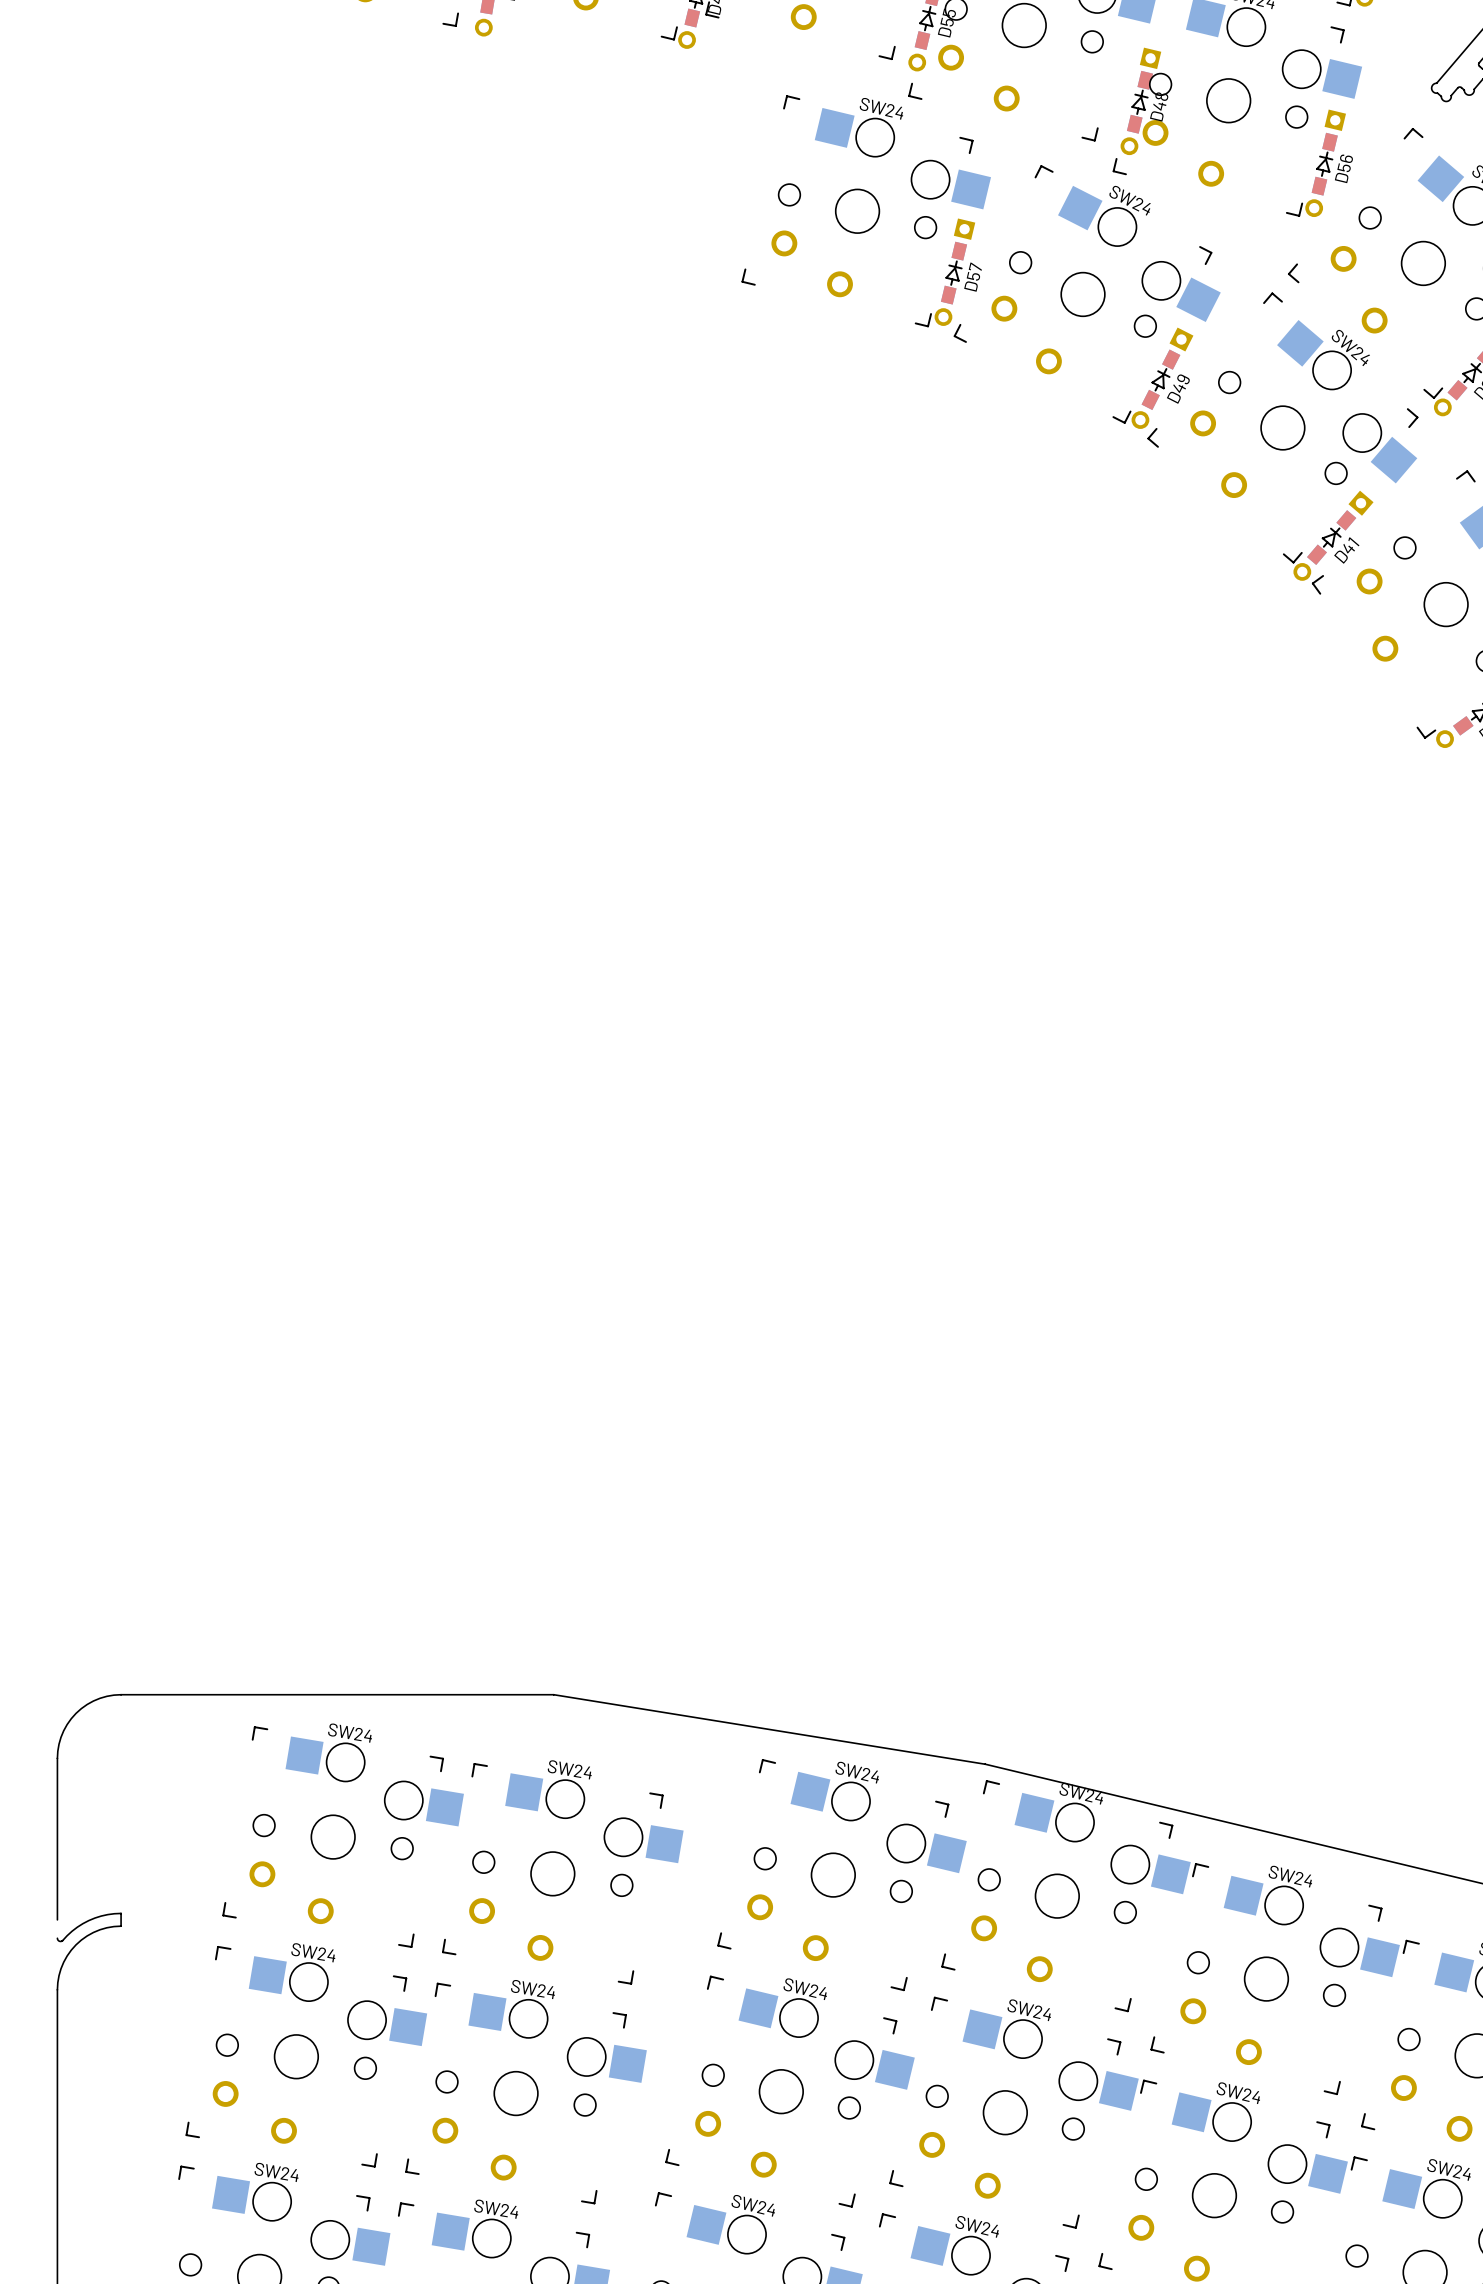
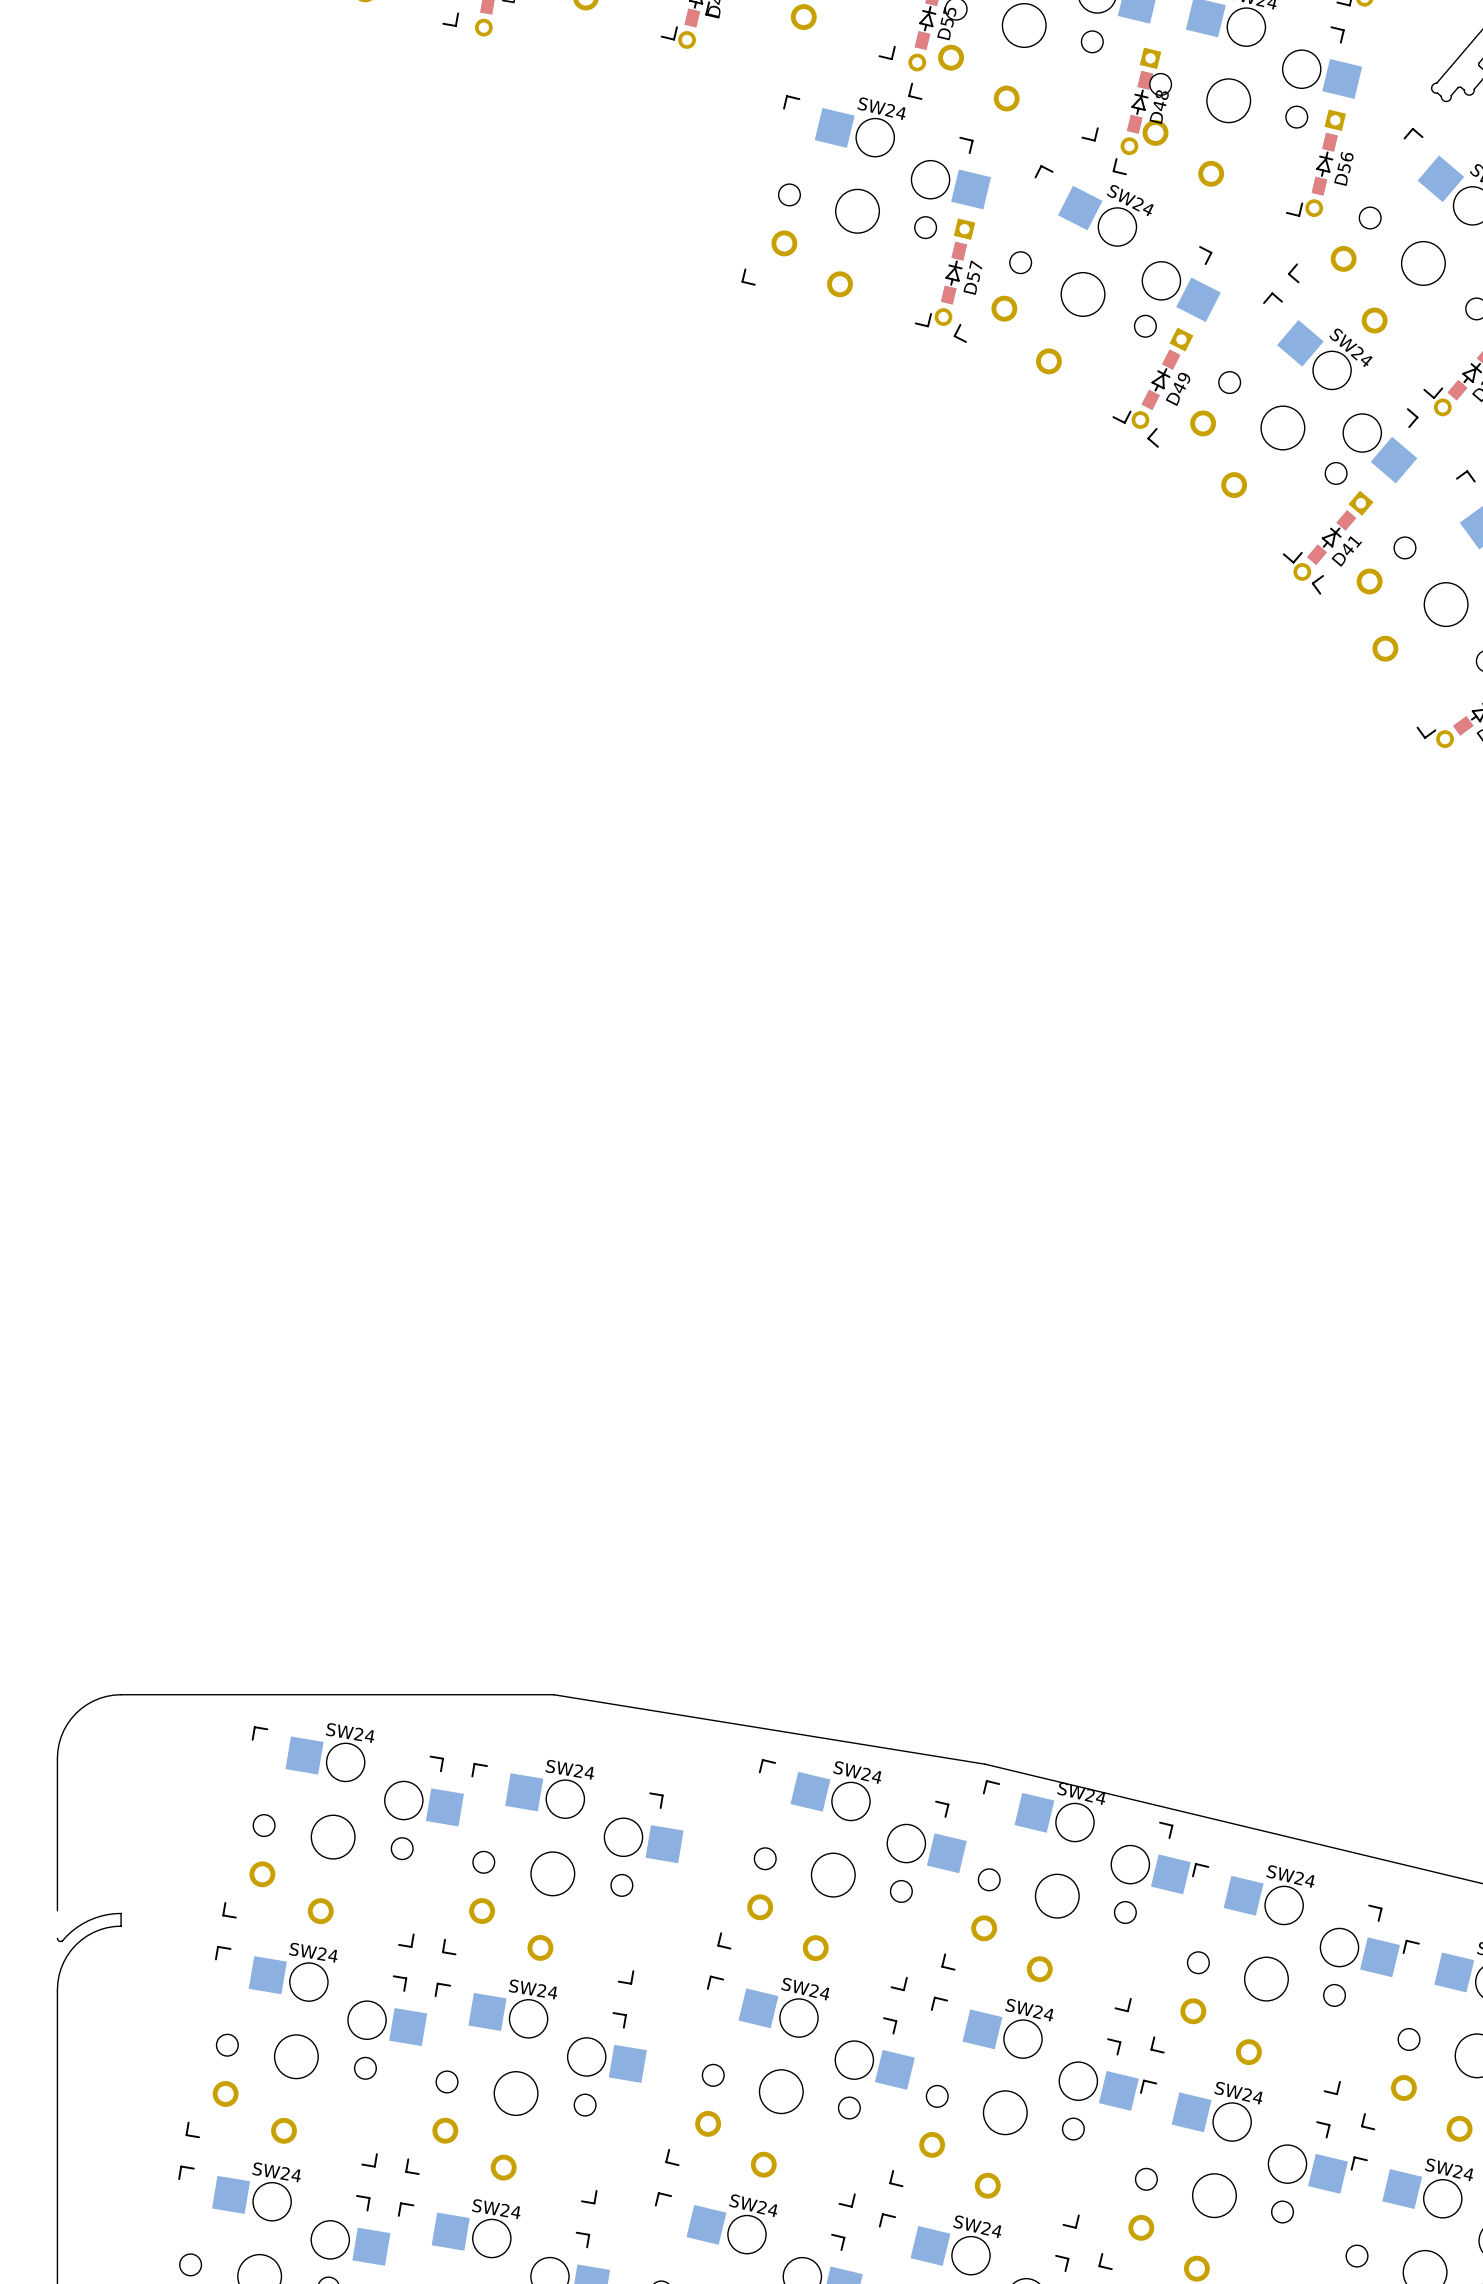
board edge: (57, 1910) (57, 1919) -> none

